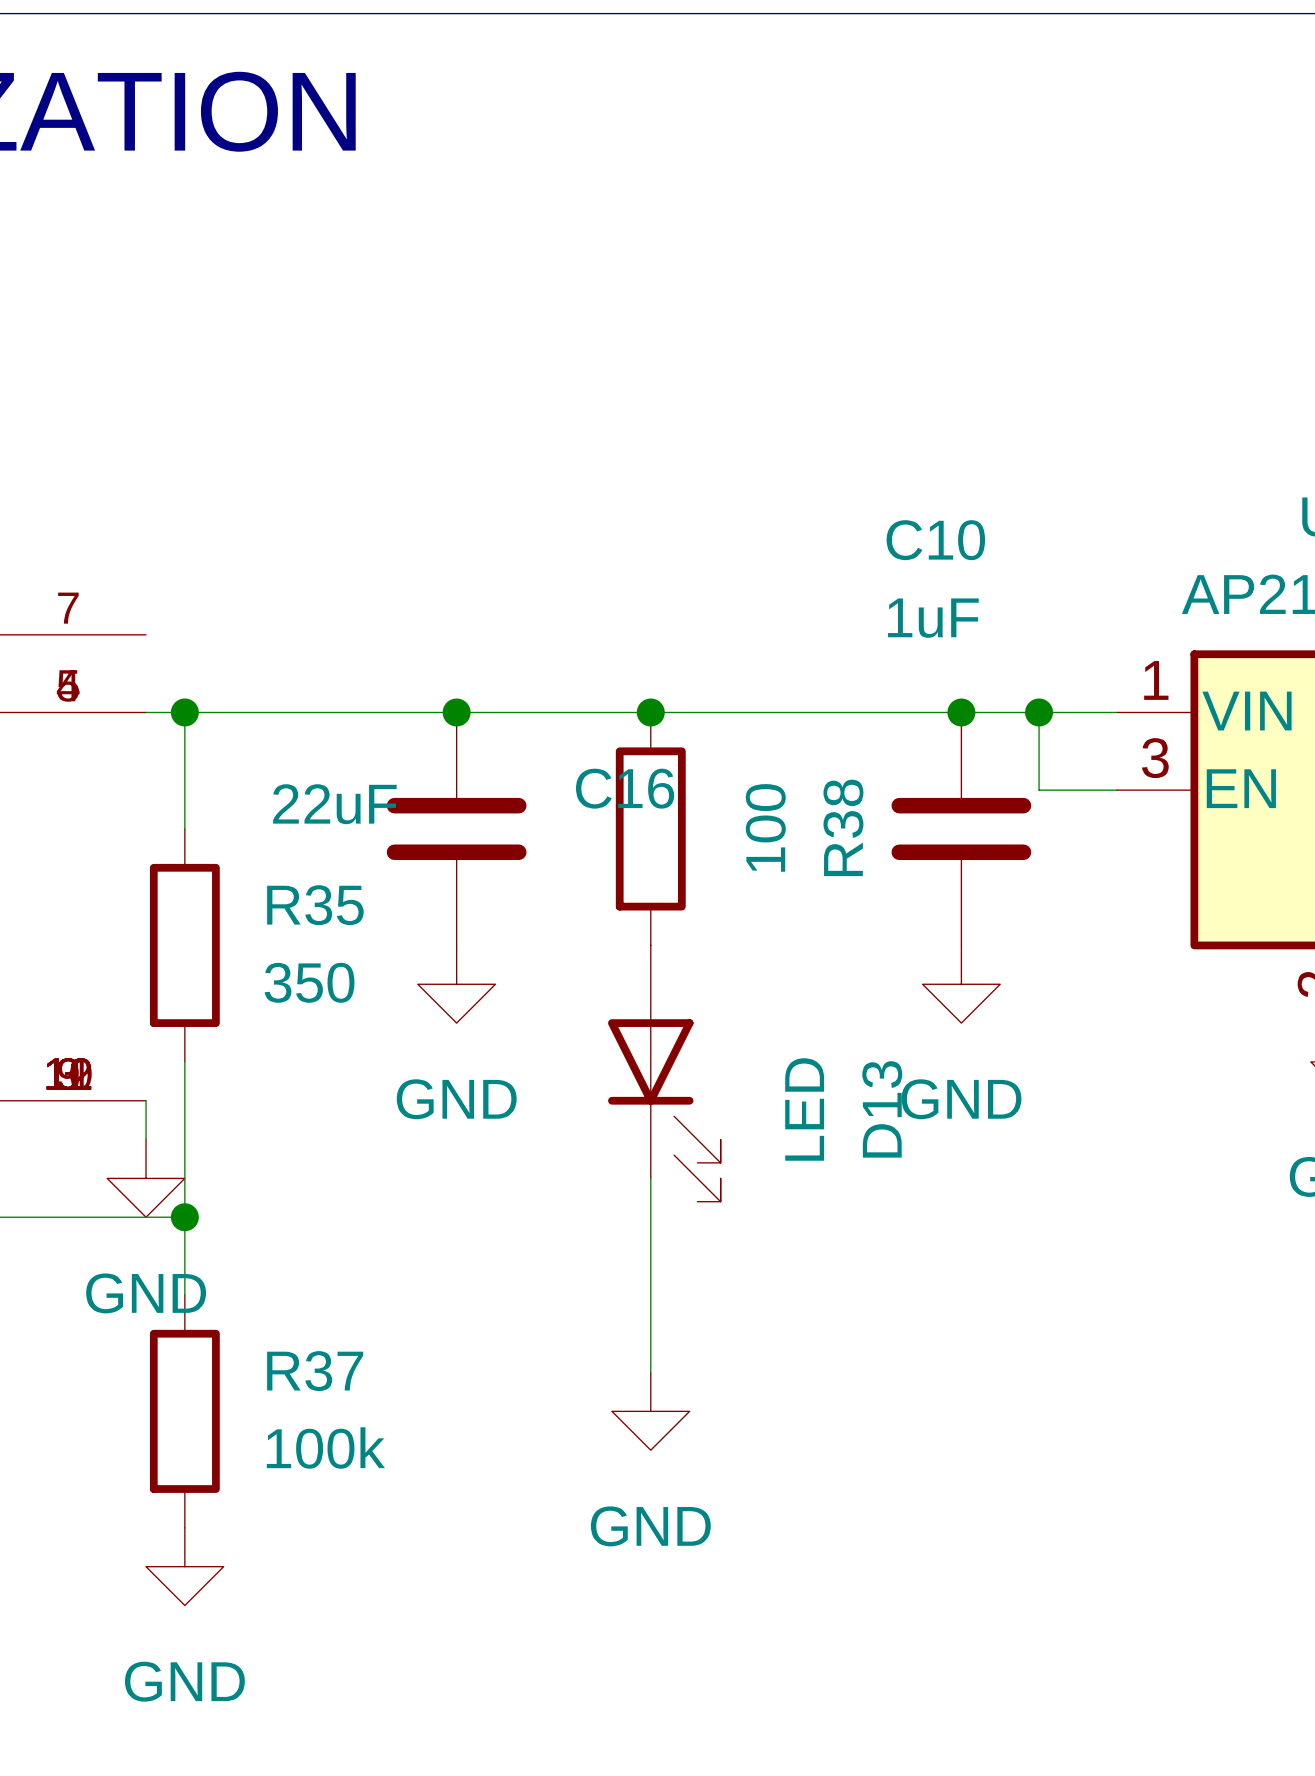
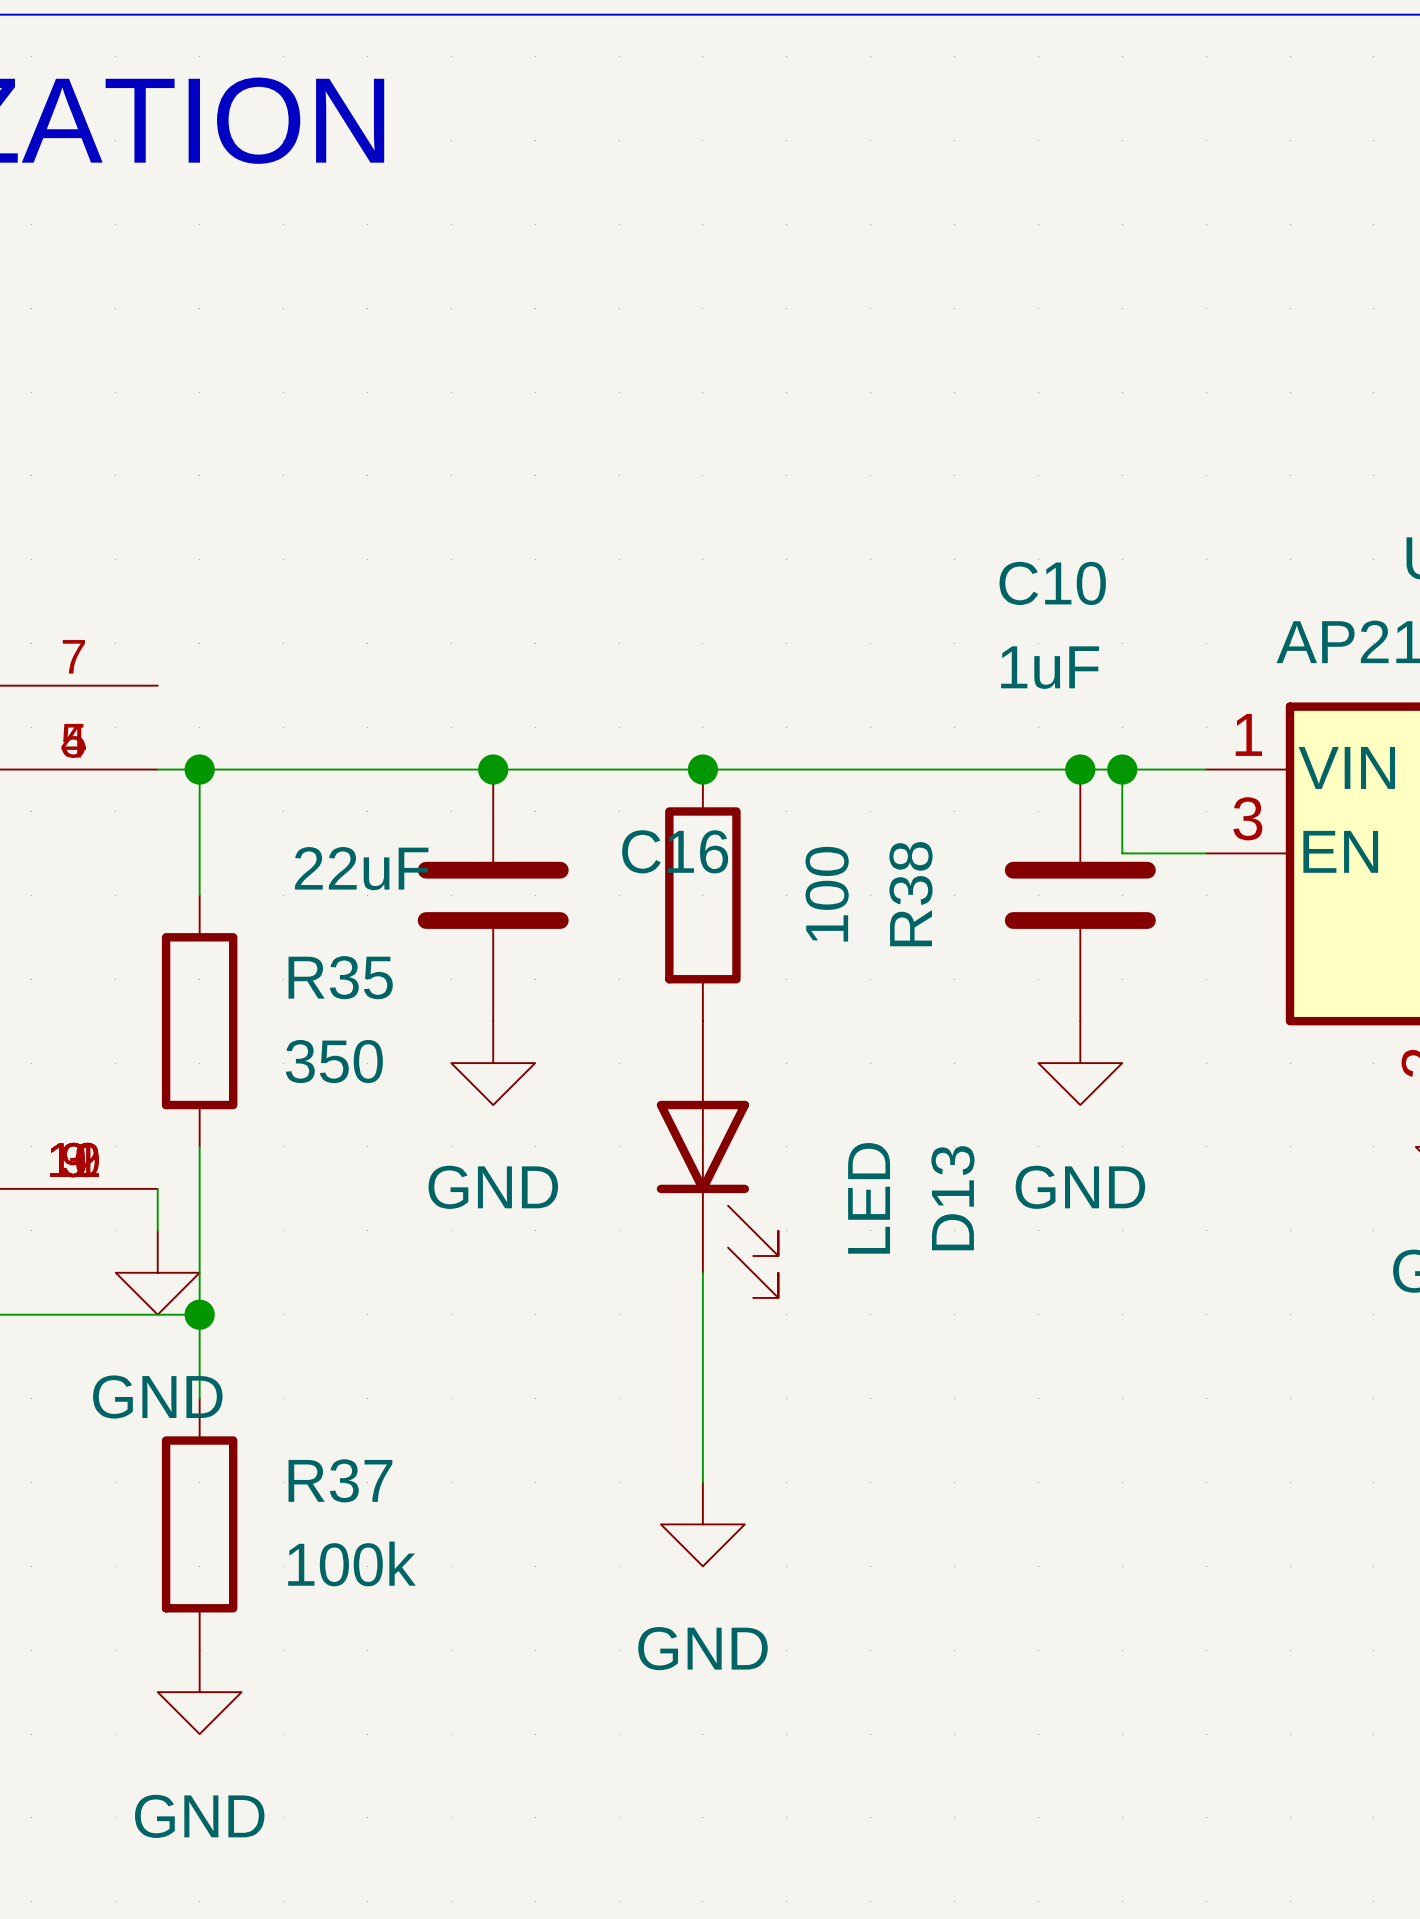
junction position: (961, 712) -> (1080, 769)
C10 position: (961, 828) -> (1080, 895)
power symbol position: GND (961, 984) -> GND (1080, 1063)

